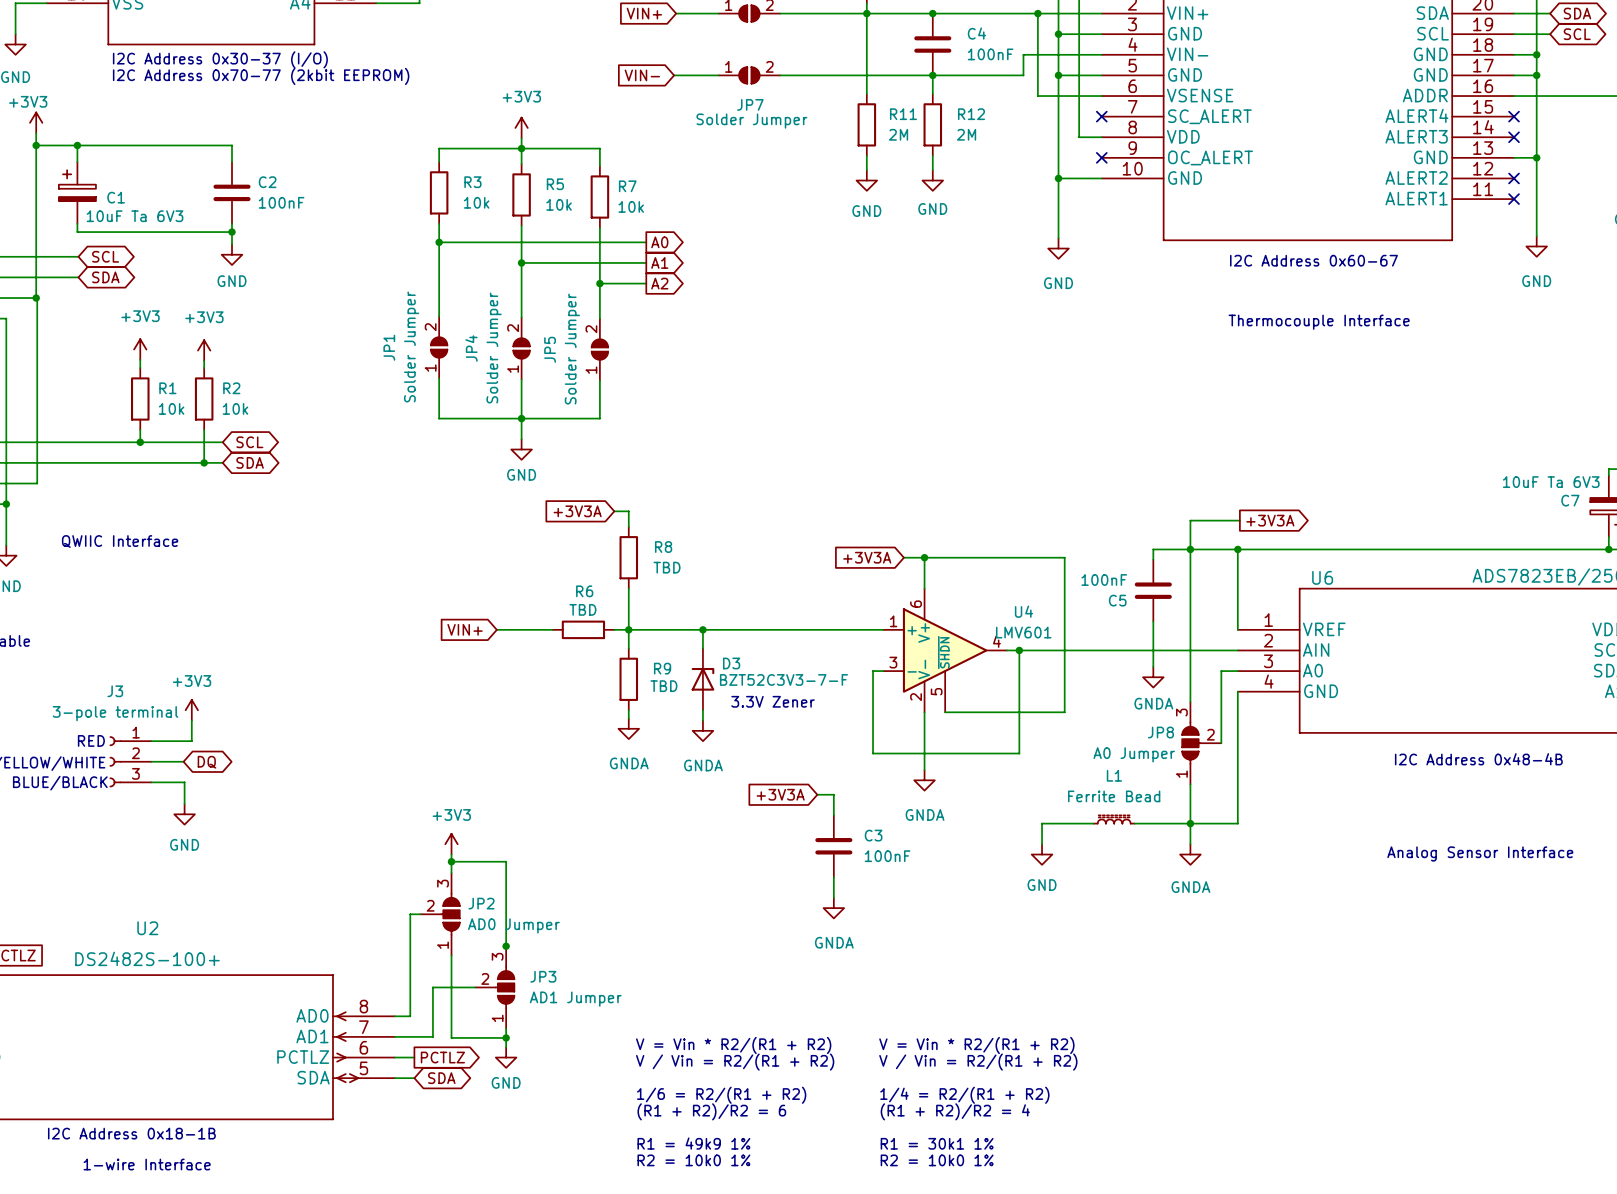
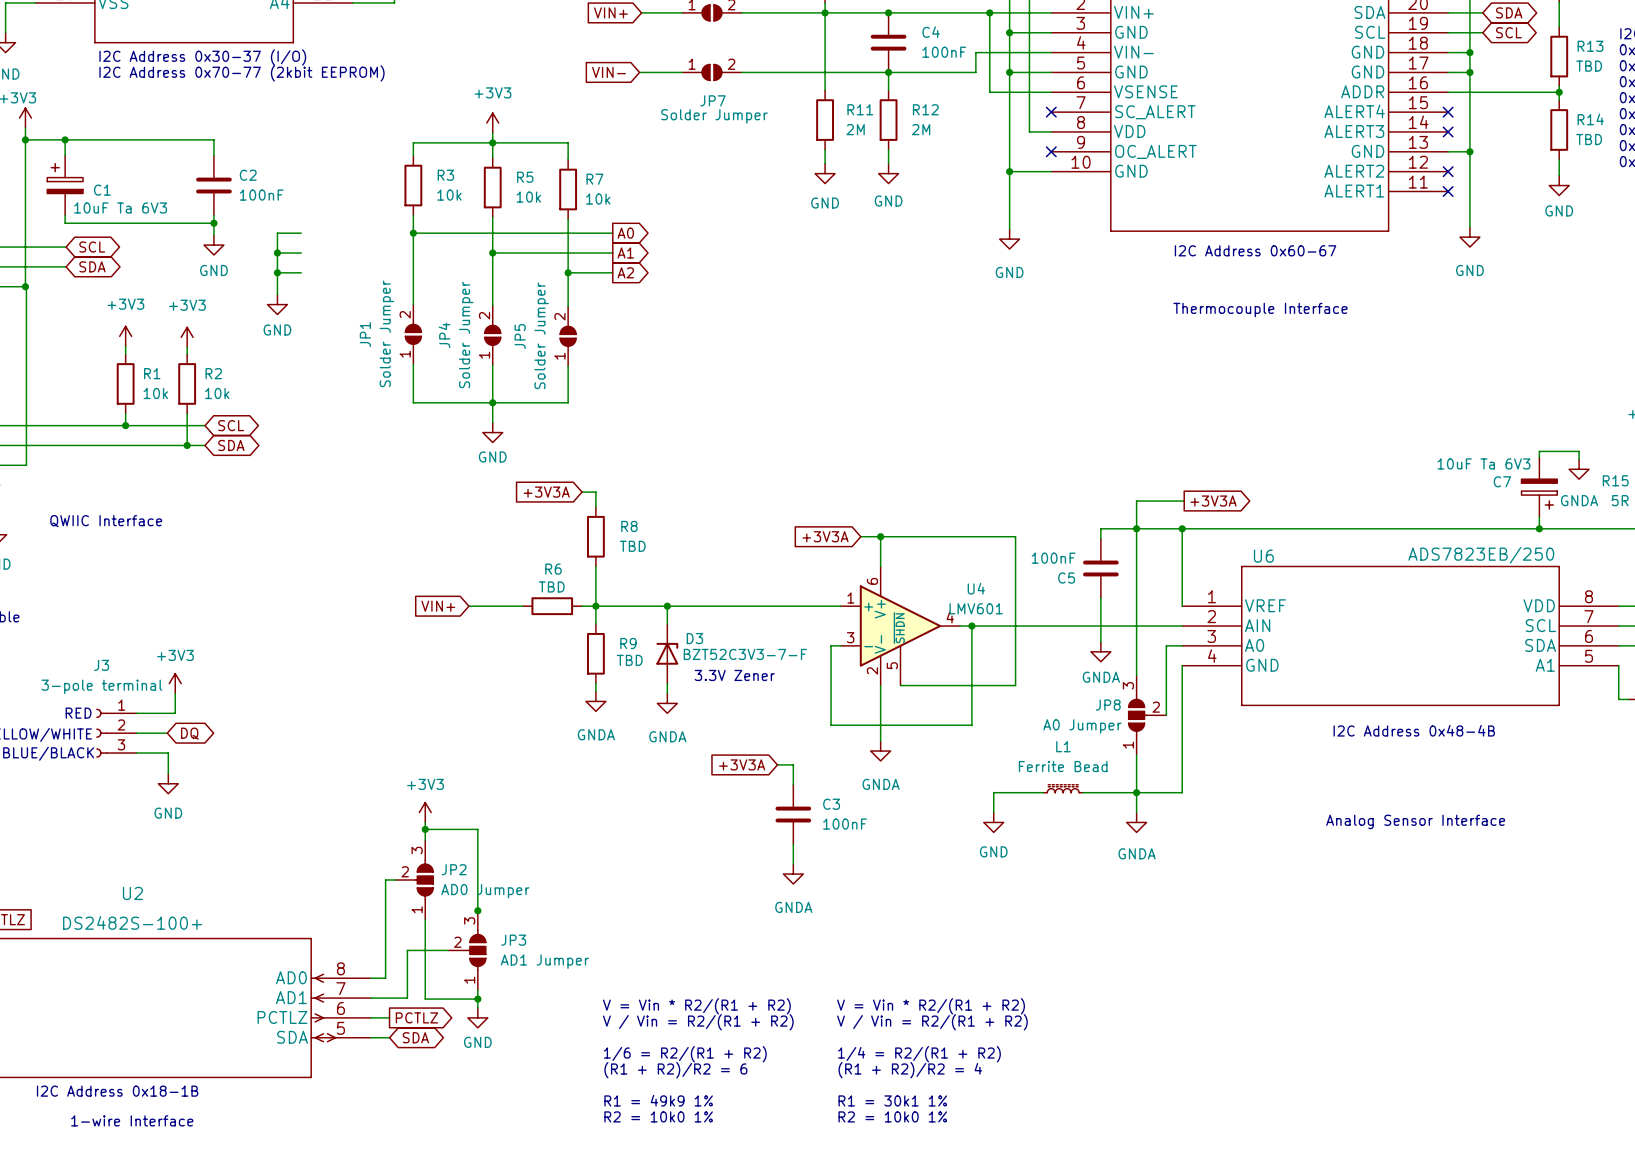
wire: none -> (301, 233) (277, 233) (277, 294)
wire: none -> (277, 253) (301, 253)
junction: none -> (277, 253)
wire: none -> (277, 272) (301, 272)
junction: none -> (277, 272)
power symbol: none -> GND (277, 304)

